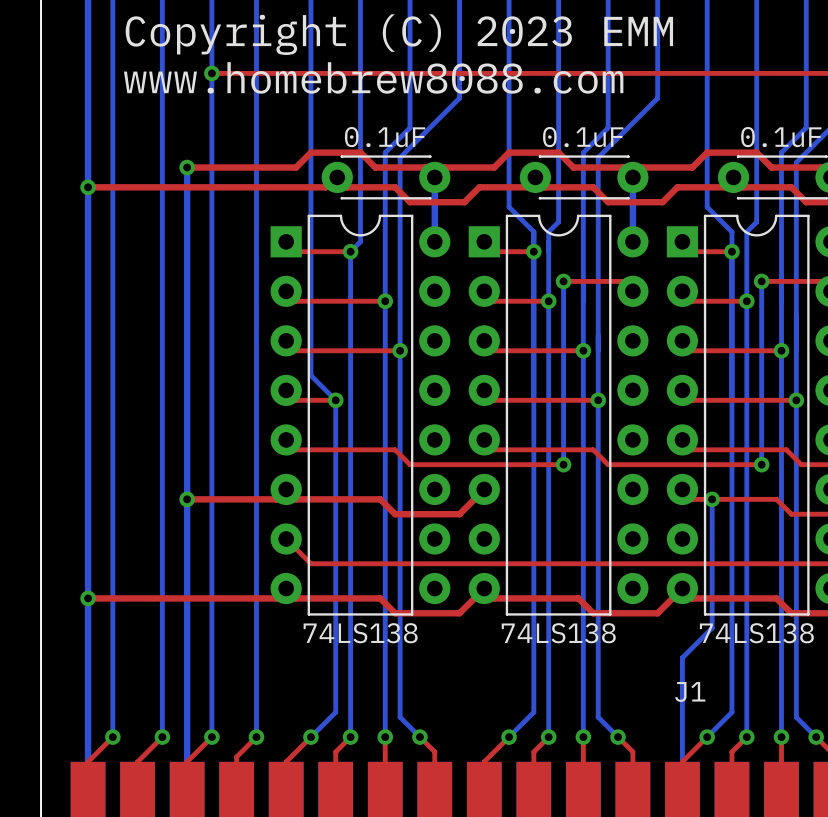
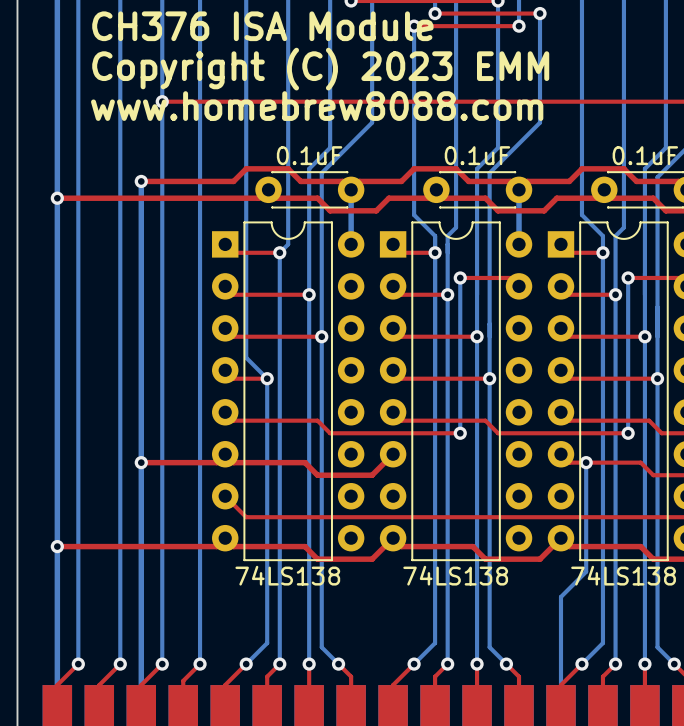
J1 name: J1 (690, 691) -> none

